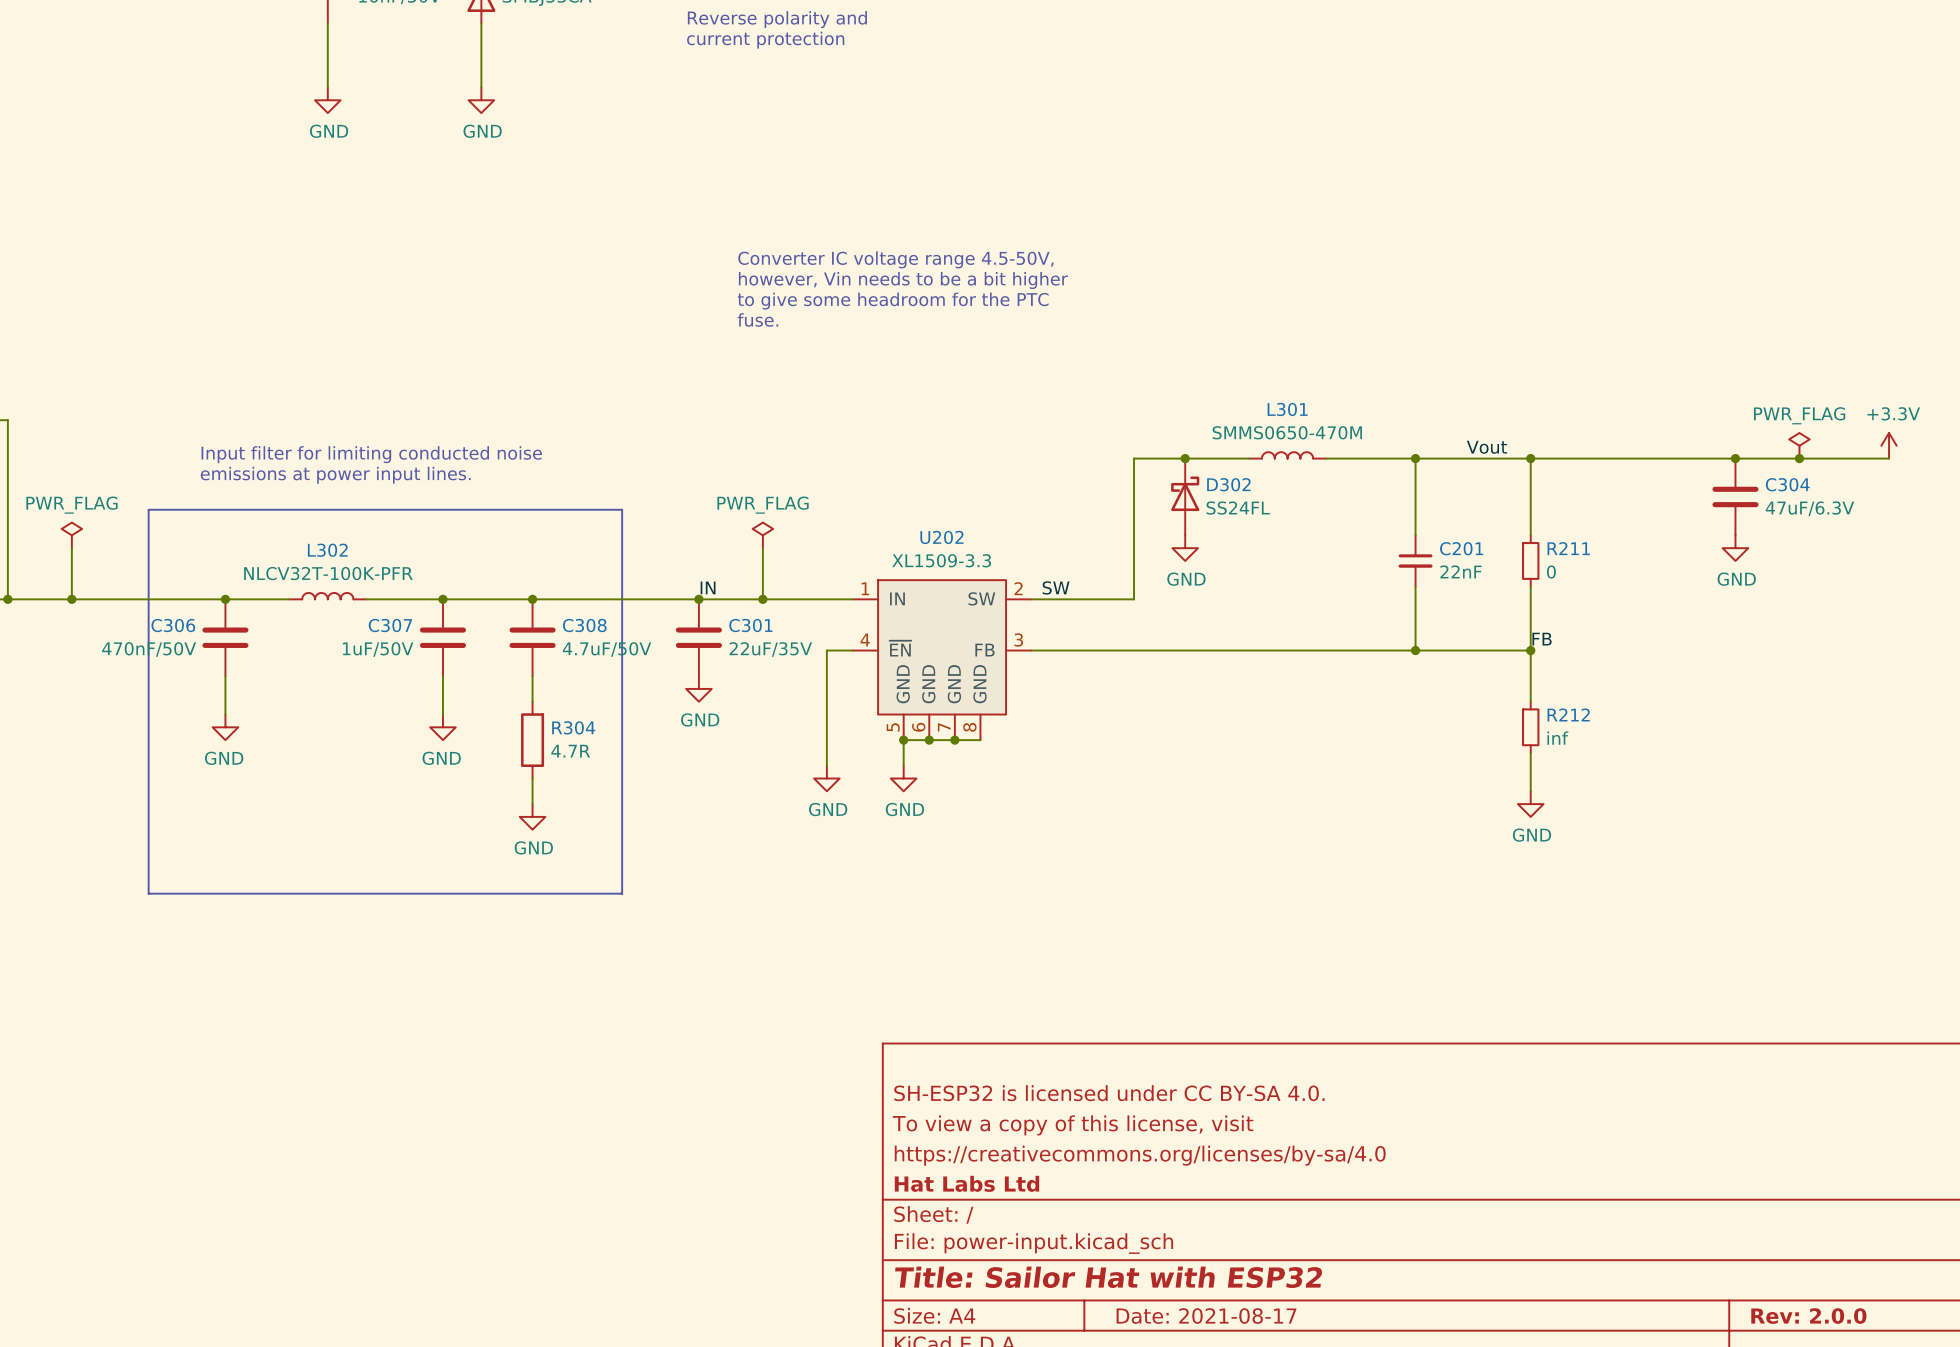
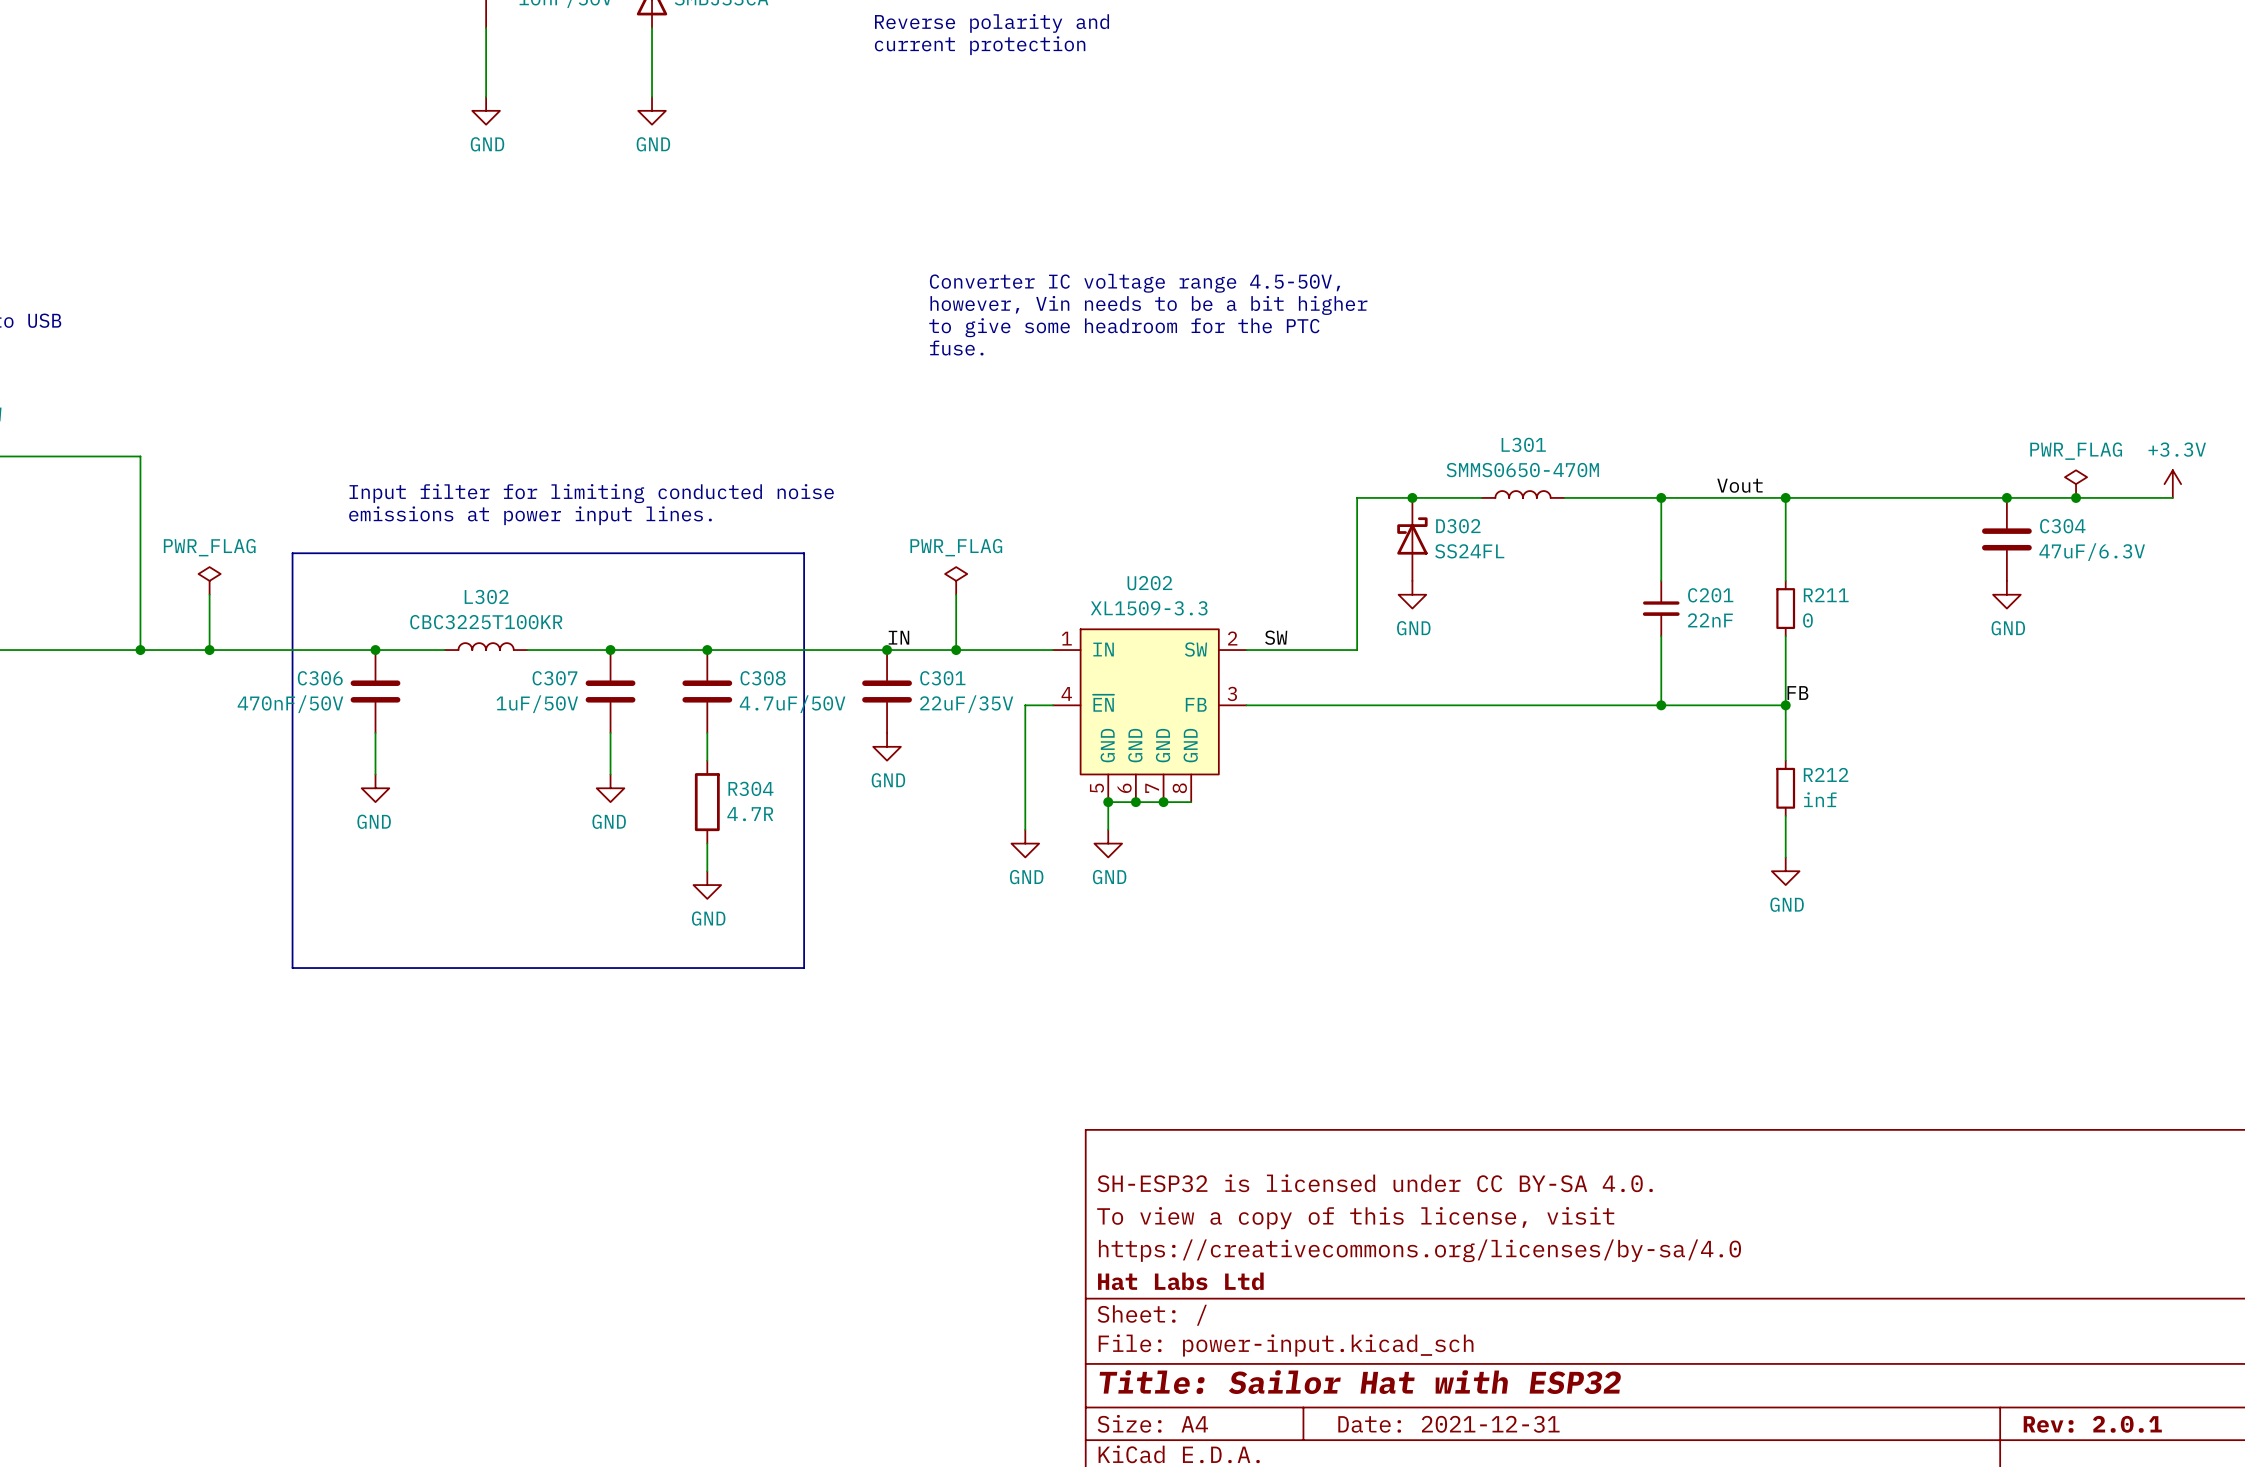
L302 value: NLCV32T-100K-PFR (328, 573) -> CBC3225T100KR (486, 622)
title block: Date: 2021-08-17 (1206, 1316) -> Date: 2021-12-31 (1448, 1424)
title block: Rev: 2.0.0 (1808, 1316) -> Rev: 2.0.1 (2092, 1424)

